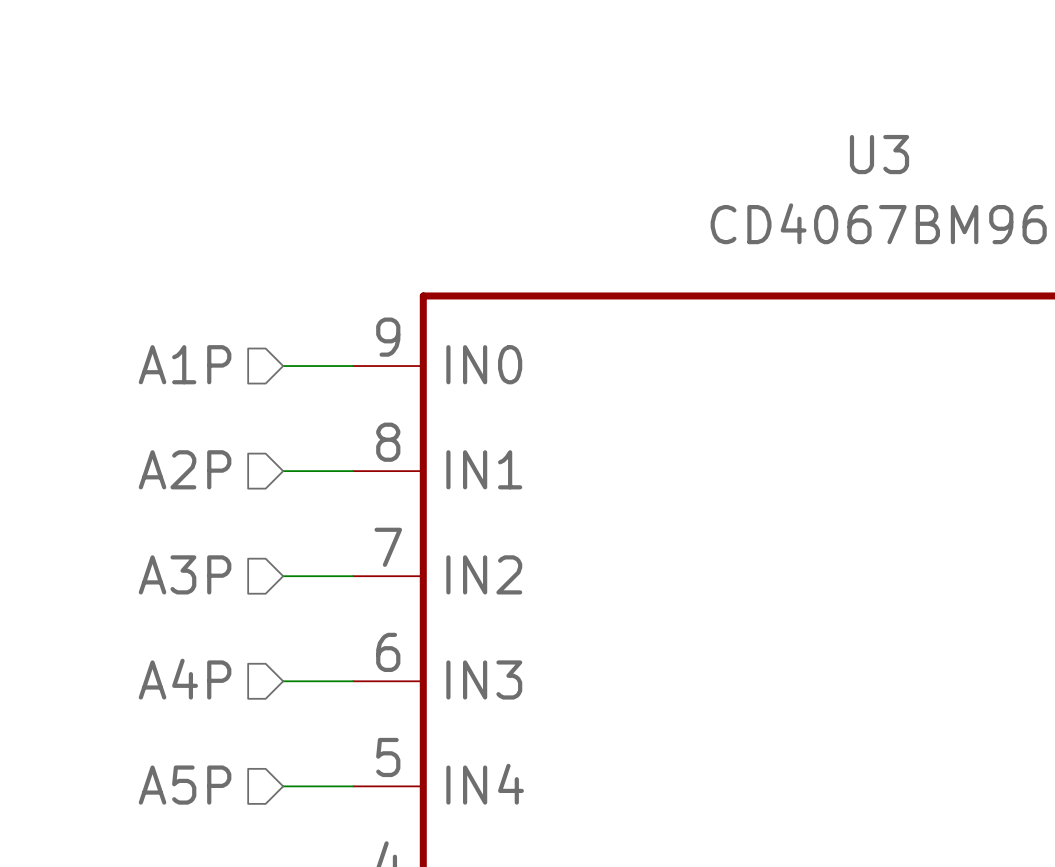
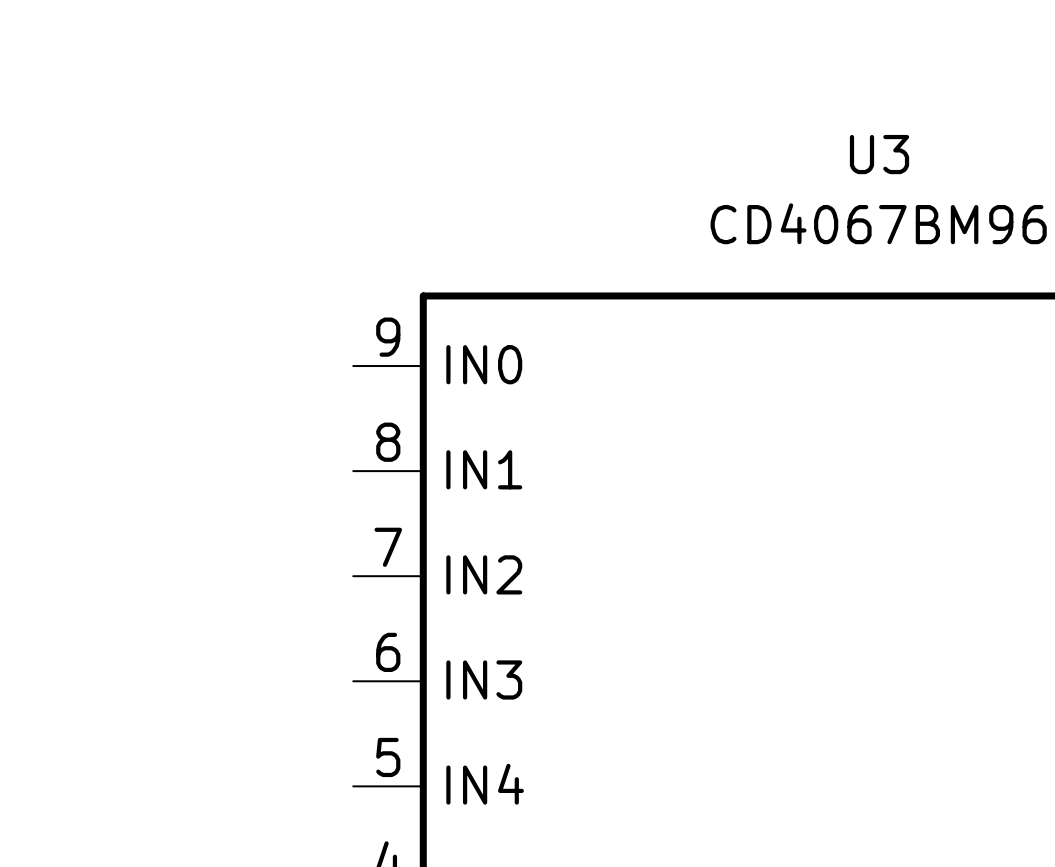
hierarchical label: A1P (185, 364) -> none
wire: (283, 366) (353, 366) -> none
hierarchical label: A2P (185, 469) -> none
wire: (283, 471) (353, 471) -> none
hierarchical label: A3P (185, 574) -> none
wire: (283, 576) (353, 576) -> none
hierarchical label: A4P (185, 679) -> none
wire: (283, 681) (353, 681) -> none
hierarchical label: A5P (185, 785) -> none
wire: (283, 786) (353, 786) -> none

